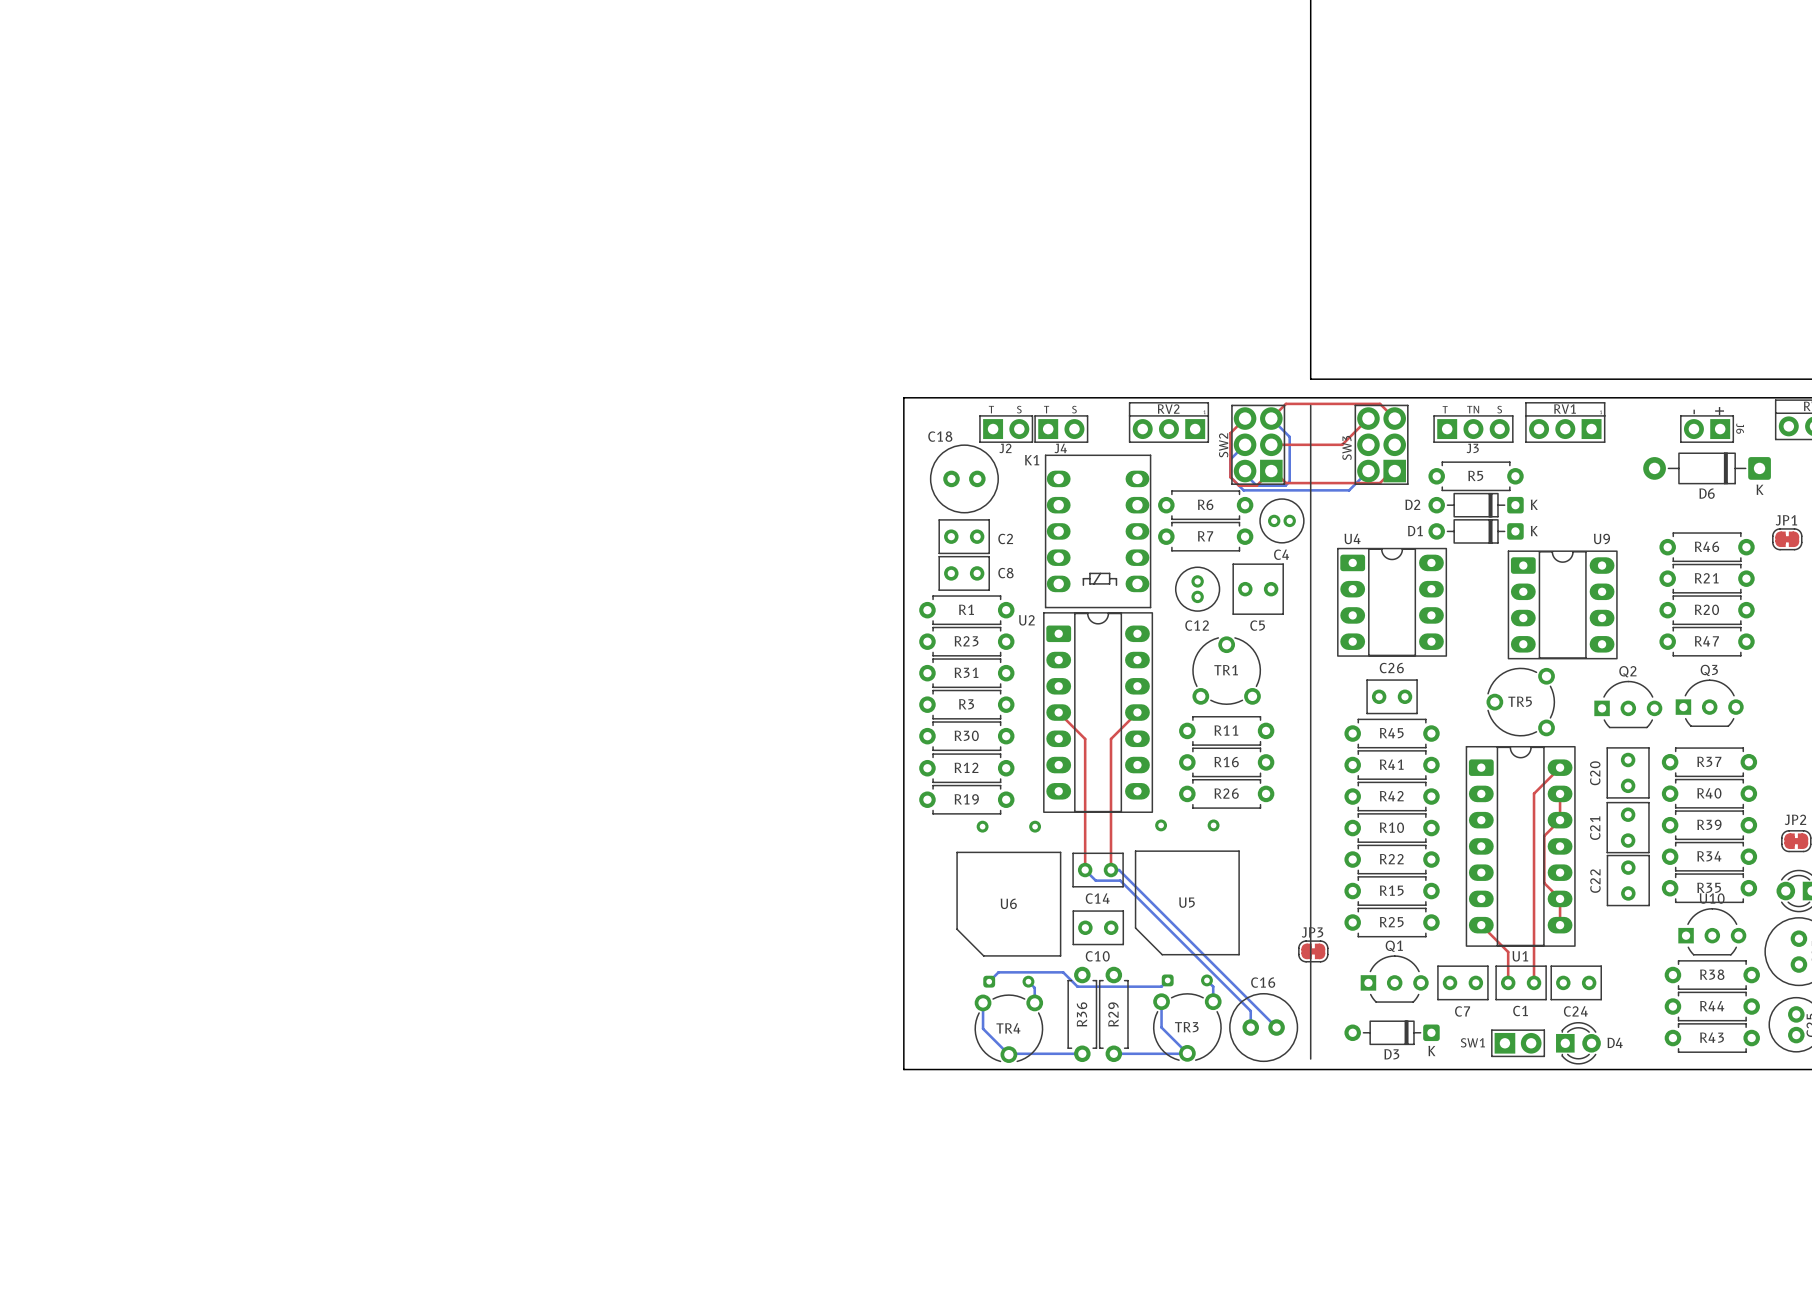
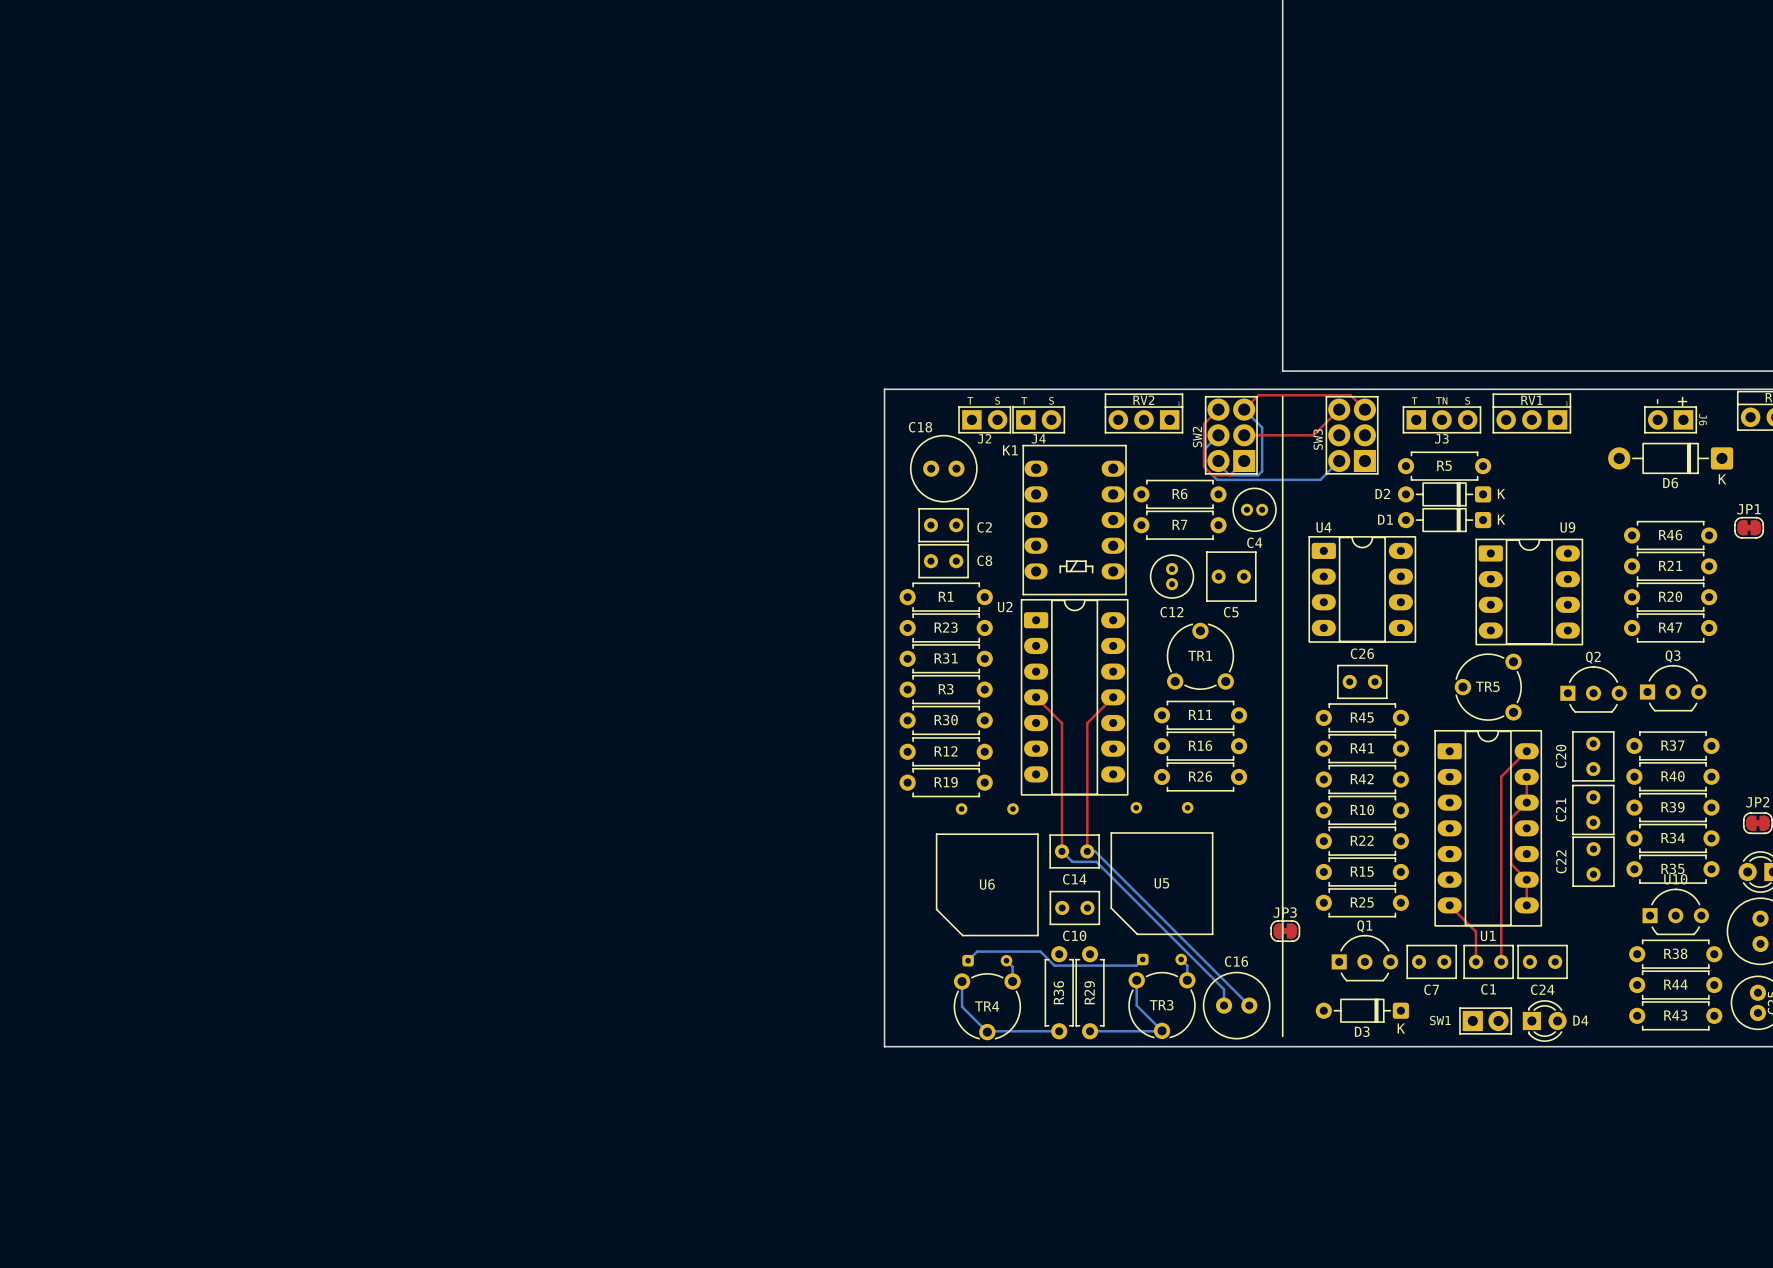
top track: (1271, 468) (1285, 483) (1380, 483) (1394, 468) -> none

